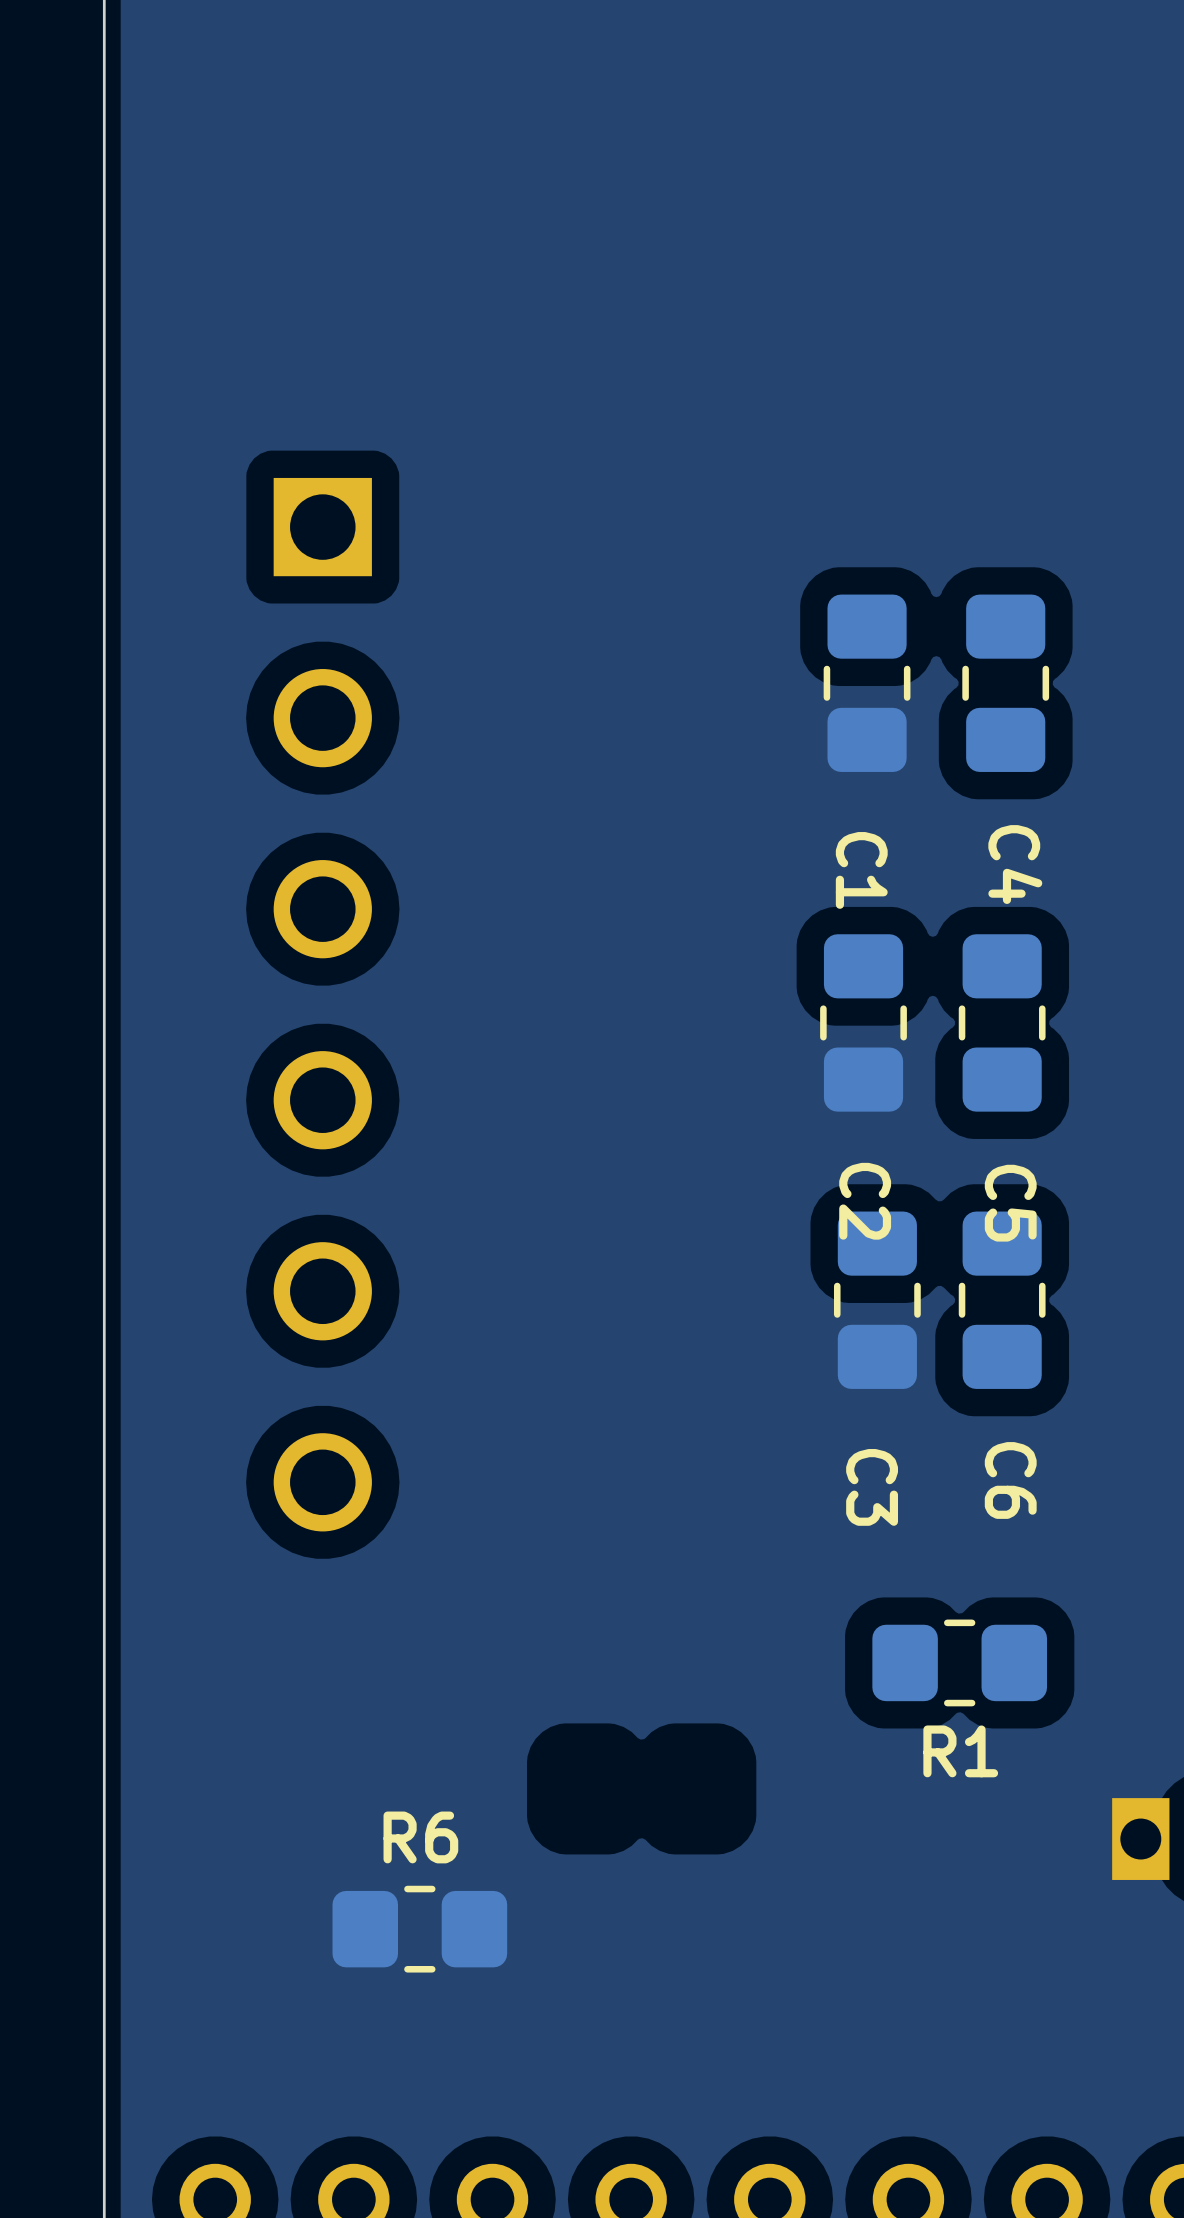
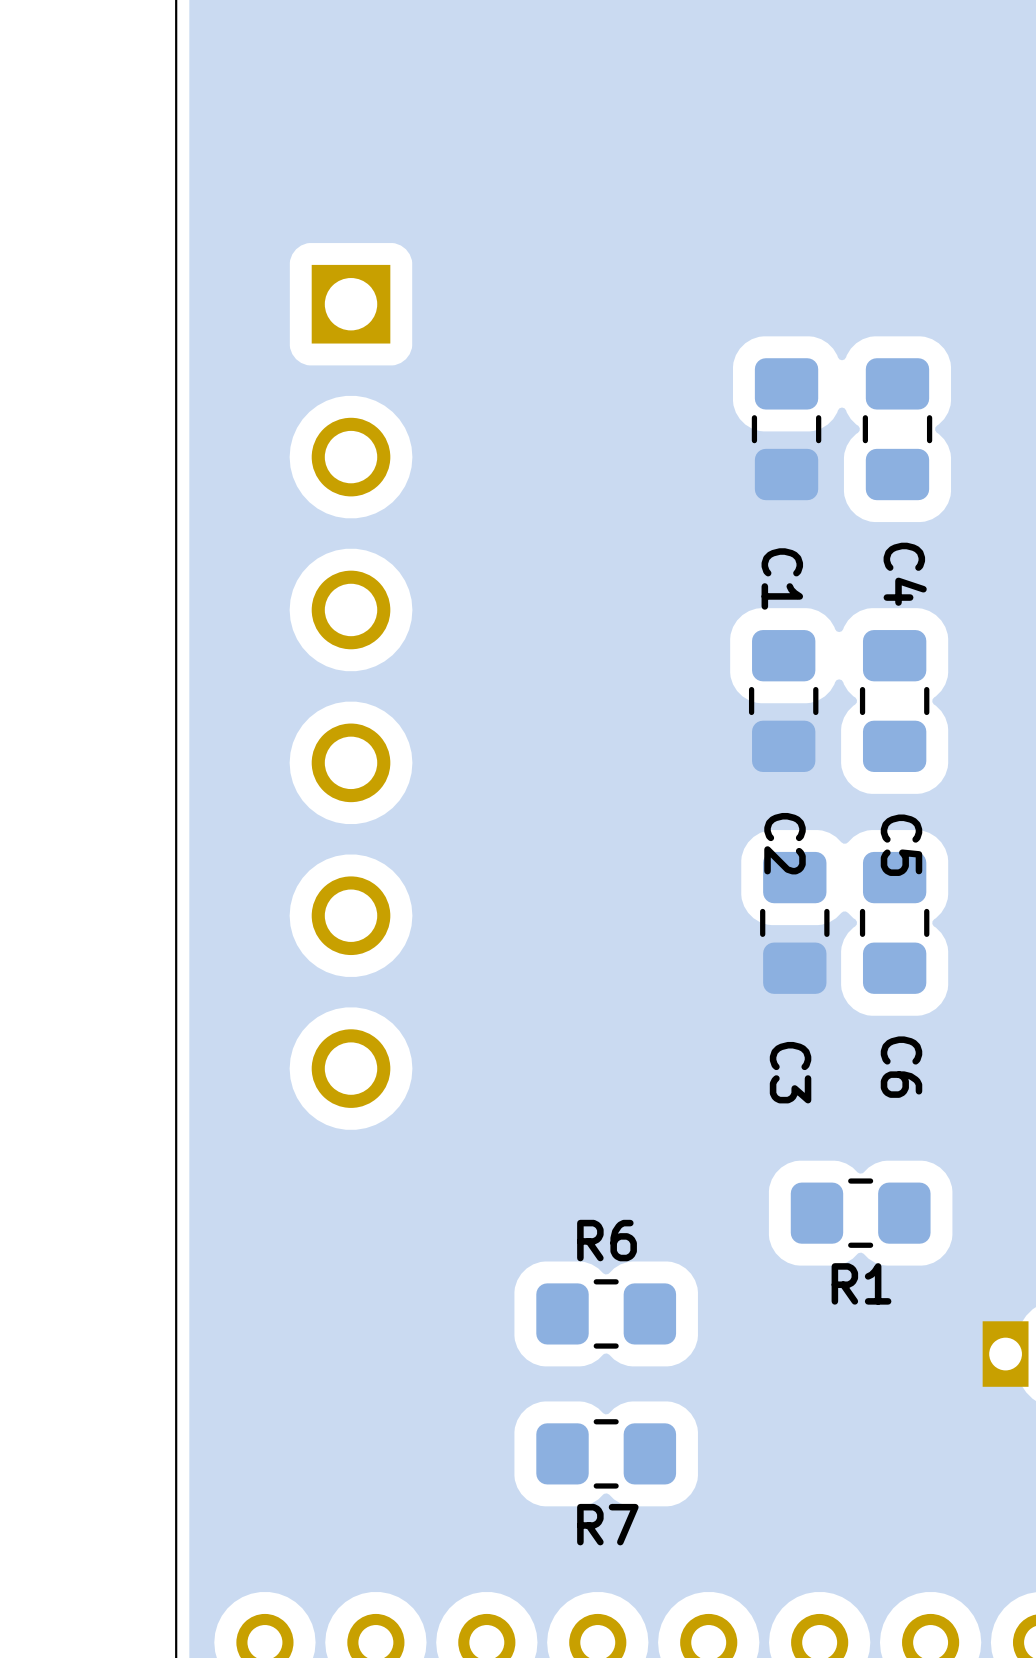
R6 position: (419, 1929) -> (606, 1313)
R7: none -> (606, 1453)

